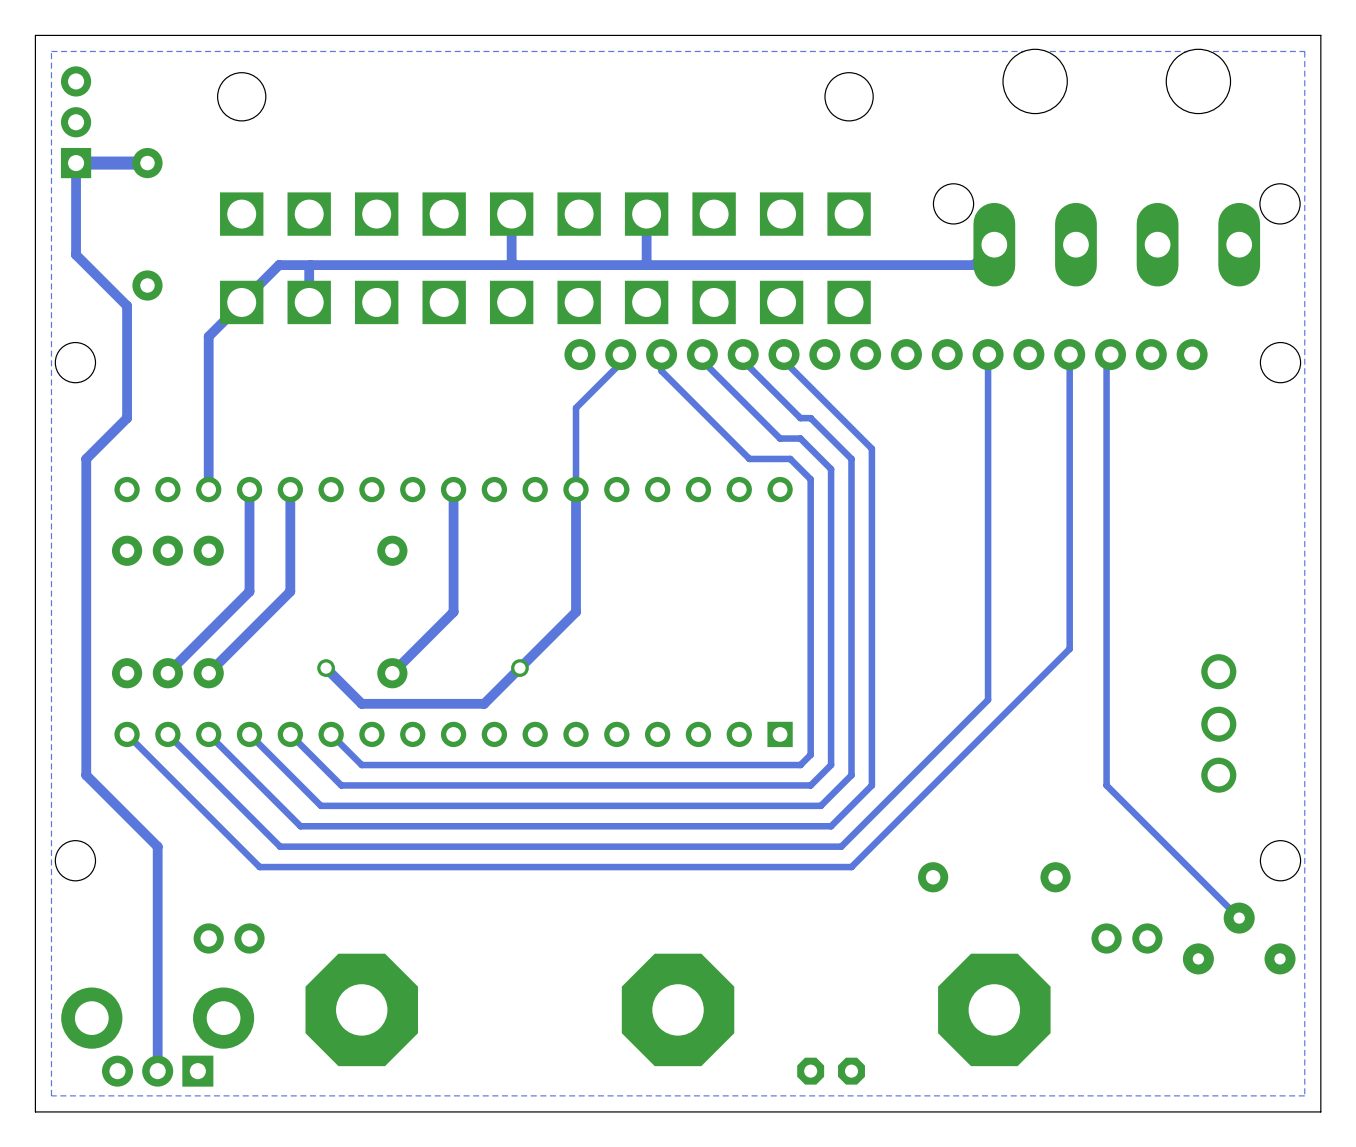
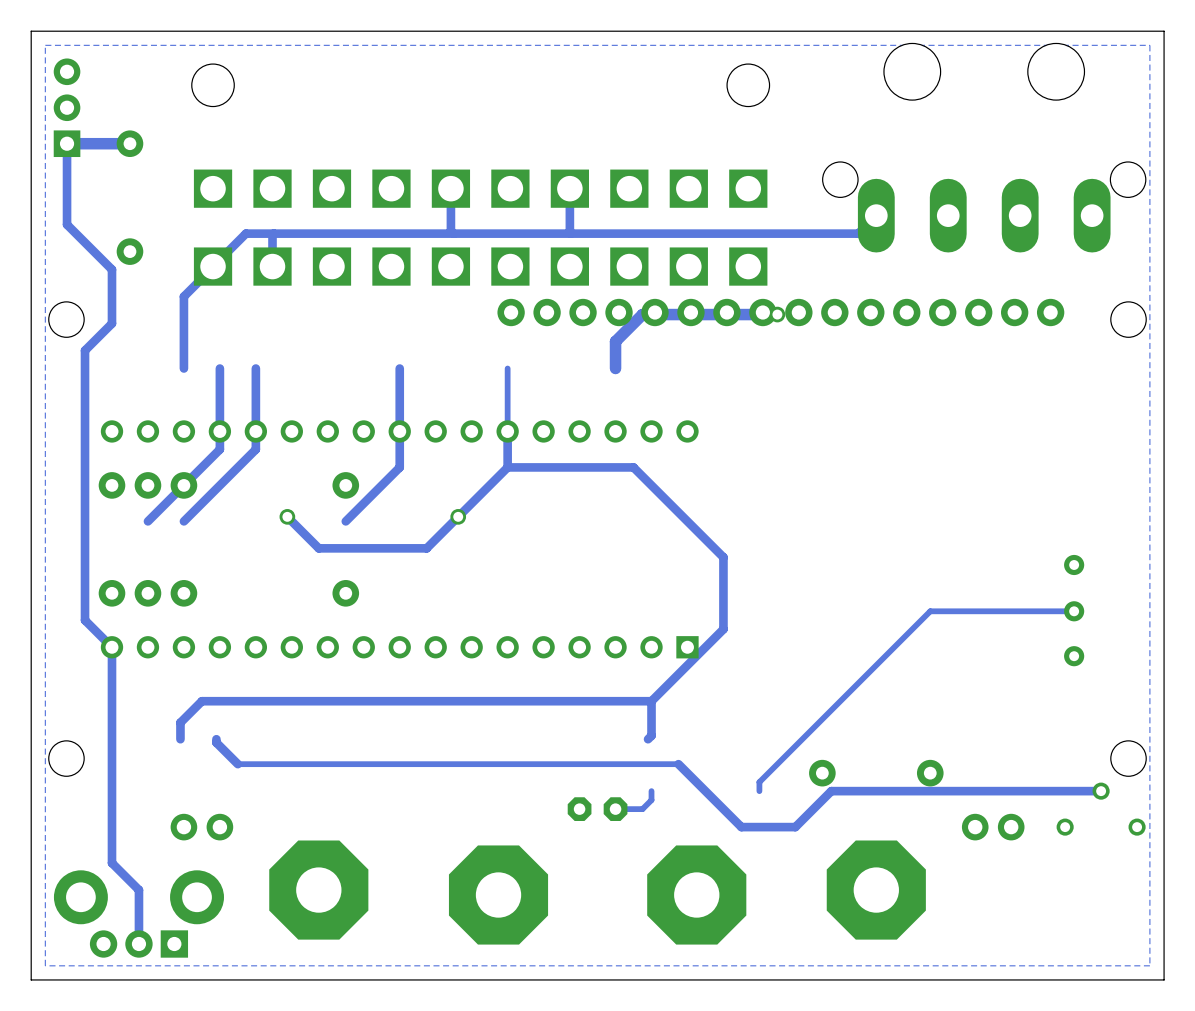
track: (620, 354) (616, 358) (616, 367) (576, 407) (576, 418) -> none
track: (661, 354) (661, 371) (749, 458) (790, 458) (810, 479) (810, 754) (800, 765) (361, 765) (331, 734) -> none
track: (702, 354) (702, 360) (780, 438) (800, 438) (831, 469) (831, 765) (810, 785) (341, 785) (290, 734) -> none
track: (743, 354) (743, 360) (800, 418) (810, 418) (851, 458) (851, 775) (820, 805) (320, 805) (249, 734) -> none
track: (784, 354) (784, 360) (871, 448) (871, 785) (831, 826) (300, 826) (208, 734) -> none
track: (988, 354) (988, 699) (841, 846) (280, 846) (167, 734) -> none
track: (1069, 354) (1069, 648) (851, 867) (769, 867) -> (1101, 791) (831, 791) (795, 827) (741, 827) (678, 764)
track: (1110, 354) (1106, 358) (1106, 785) (1239, 918) -> none
track: none -> (777, 314) (642, 314) (615, 341) (615, 368)
via: none -> (777, 314)
track: (127, 367) (127, 418) (86, 458) (86, 775) (157, 846) (157, 1009) -> (111, 323) (85, 350) (85, 620) (111, 647) (111, 863) (138, 890)
track: (208, 418) (208, 489) -> (219, 368) (219, 431)
track: none -> (255, 368) (255, 431)
track: none -> (399, 368) (399, 431)
track: (249, 509) (249, 591) (167, 673) -> (219, 449) (147, 521)
track: (290, 509) (290, 591) (208, 673) -> (255, 449) (183, 521)
track: (453, 530) (453, 612) (392, 673) -> (399, 467) (345, 521)
track: (576, 530) (576, 612) (484, 703) (361, 703) (326, 668) -> none
track: none -> (287, 516) (318, 548) (426, 548) (507, 467) (633, 467) (723, 557) (723, 629) (651, 701)
via position: (326, 668) -> (287, 516)
via position: (519, 668) -> (458, 516)
part: none -> (1074, 610)
track: none -> (1074, 611) (930, 611) (759, 782) (759, 791)
part: (1218, 723) -> none
track: (127, 734) (259, 867) (269, 867) -> (216, 739) (216, 742) (237, 764)
track: none -> (651, 701) (651, 735) (648, 739)
track: none -> (651, 701) (201, 701) (180, 722) (180, 739)
track: none -> (651, 791) (651, 800) (642, 809) (615, 809)
part: none -> (1101, 809)
part: (1239, 938) -> none
part: (678, 1009) -> none
part: none -> (498, 895)
part: none -> (696, 895)
part position: (831, 1071) -> (597, 809)

